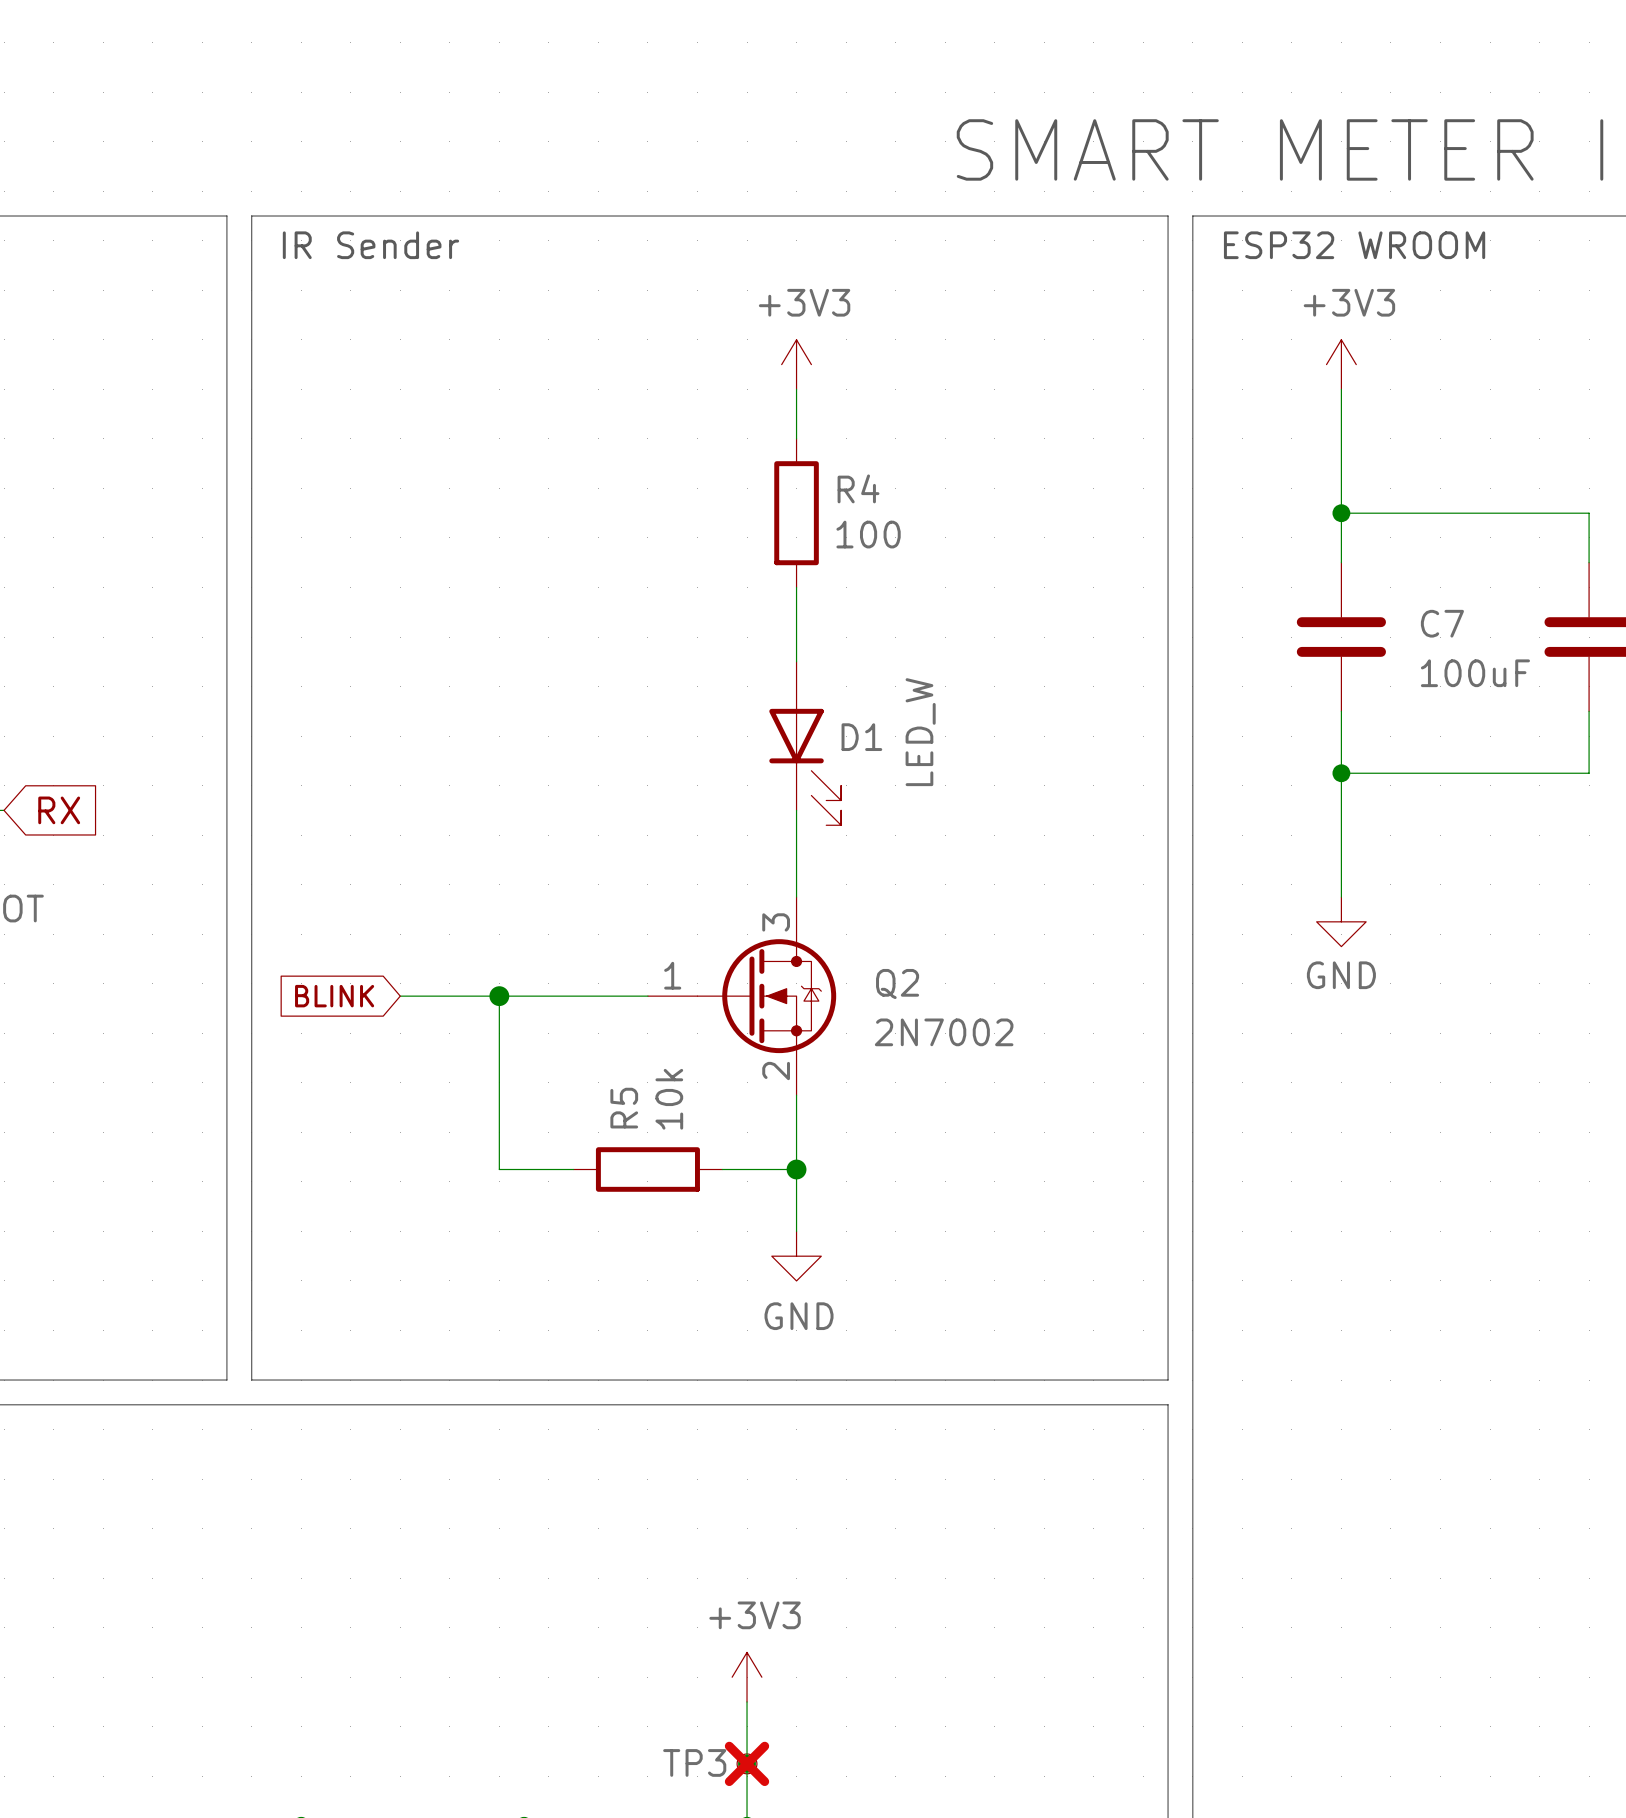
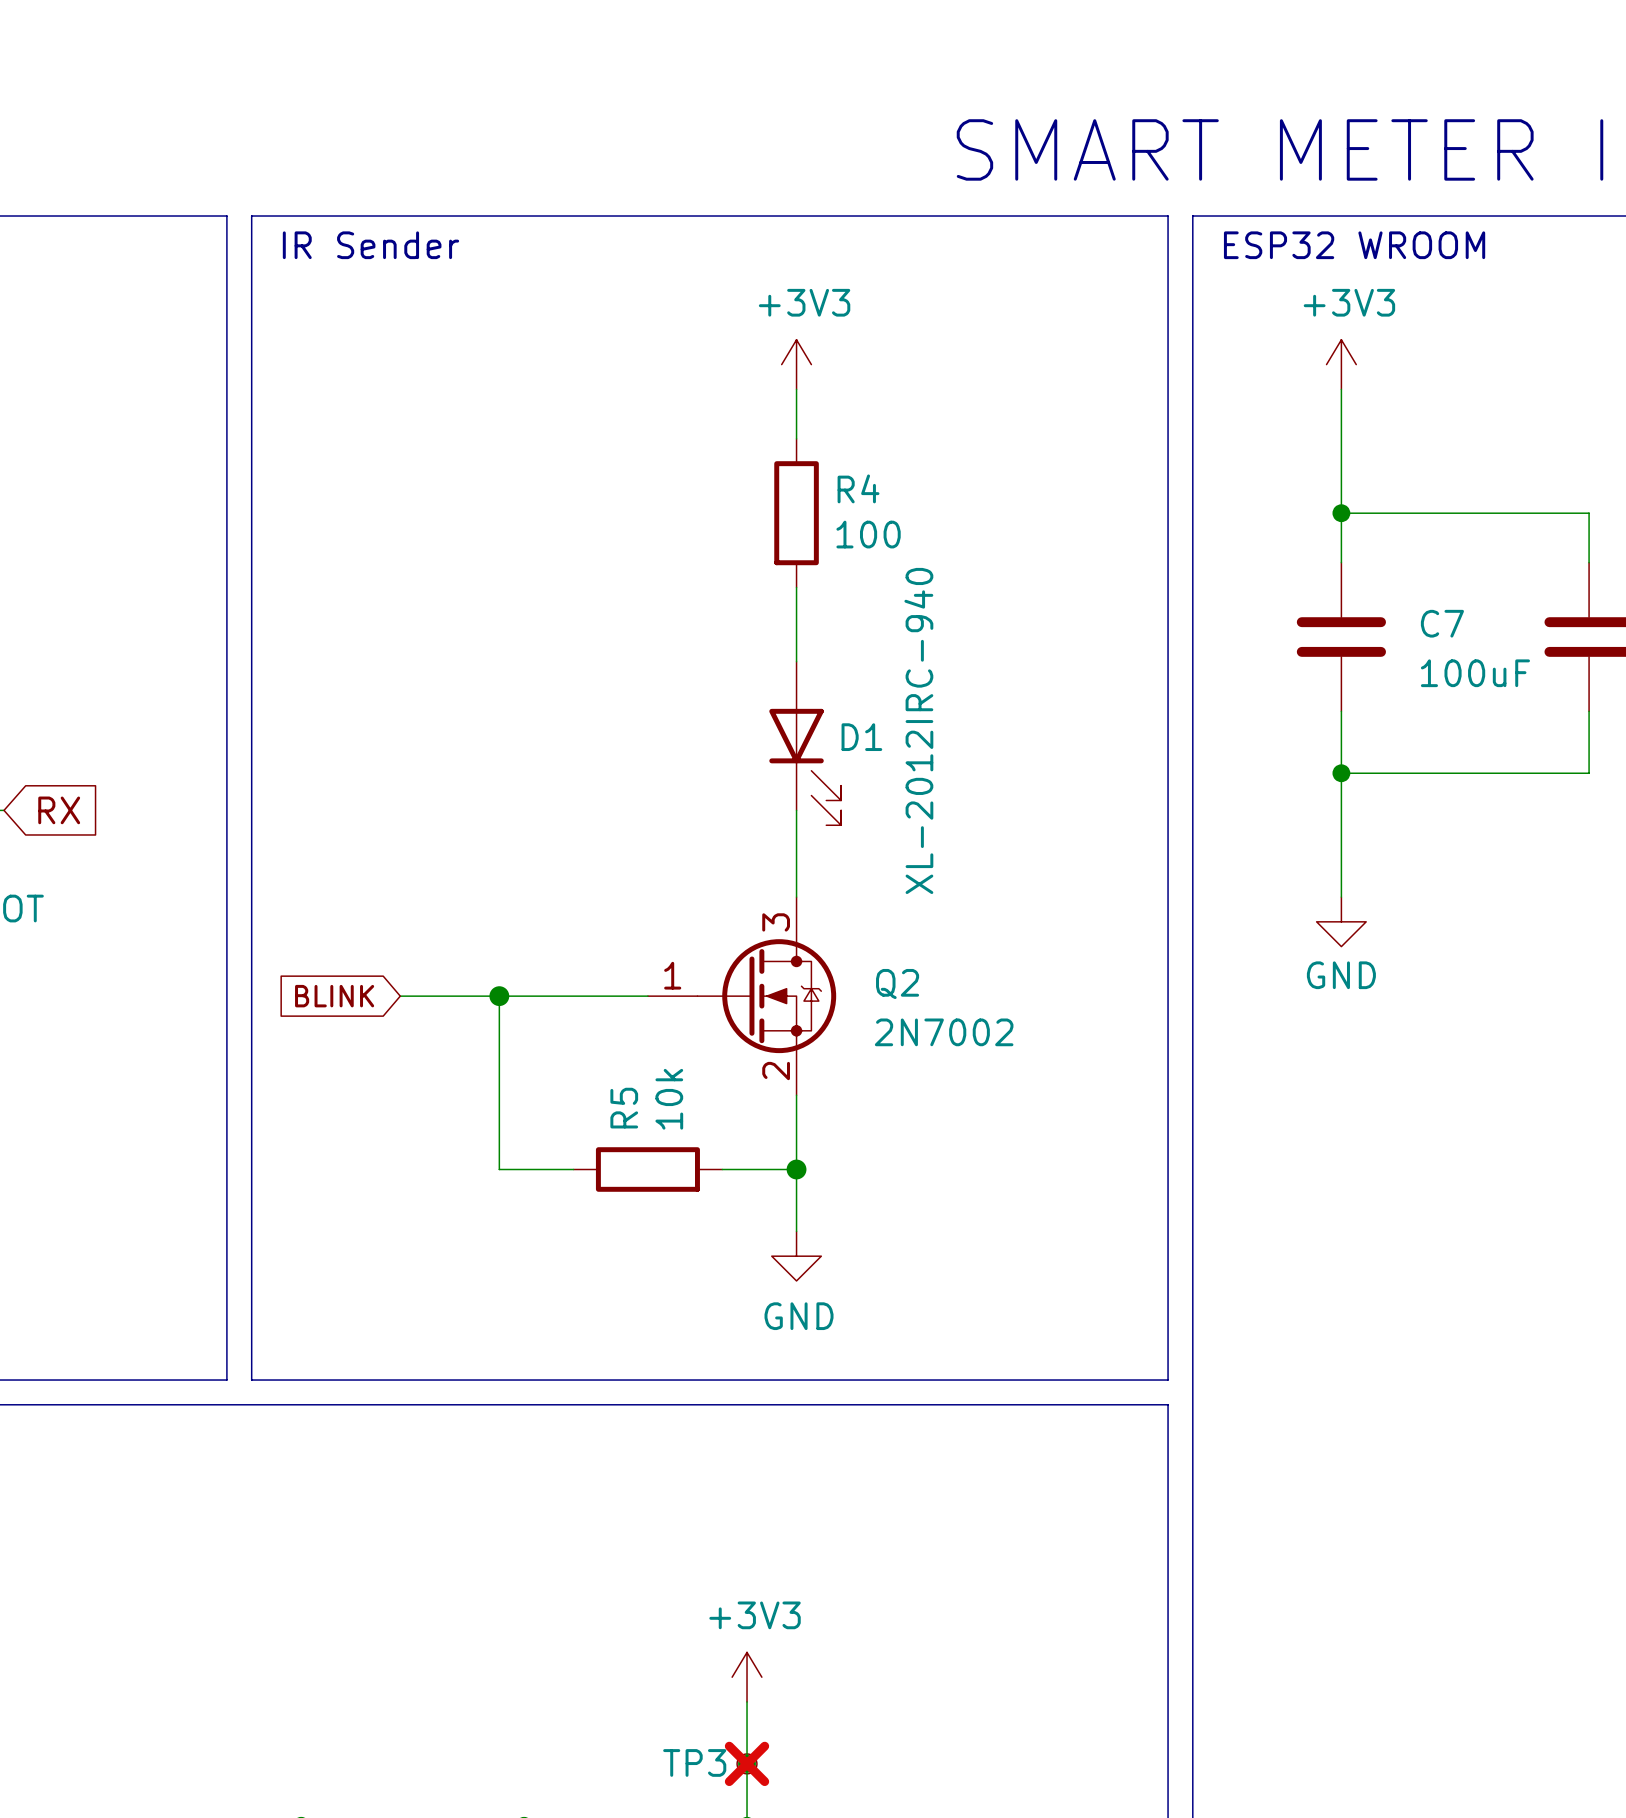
D1 value: LED_W (920, 732) -> XL-2012IRC-940 (918, 730)

